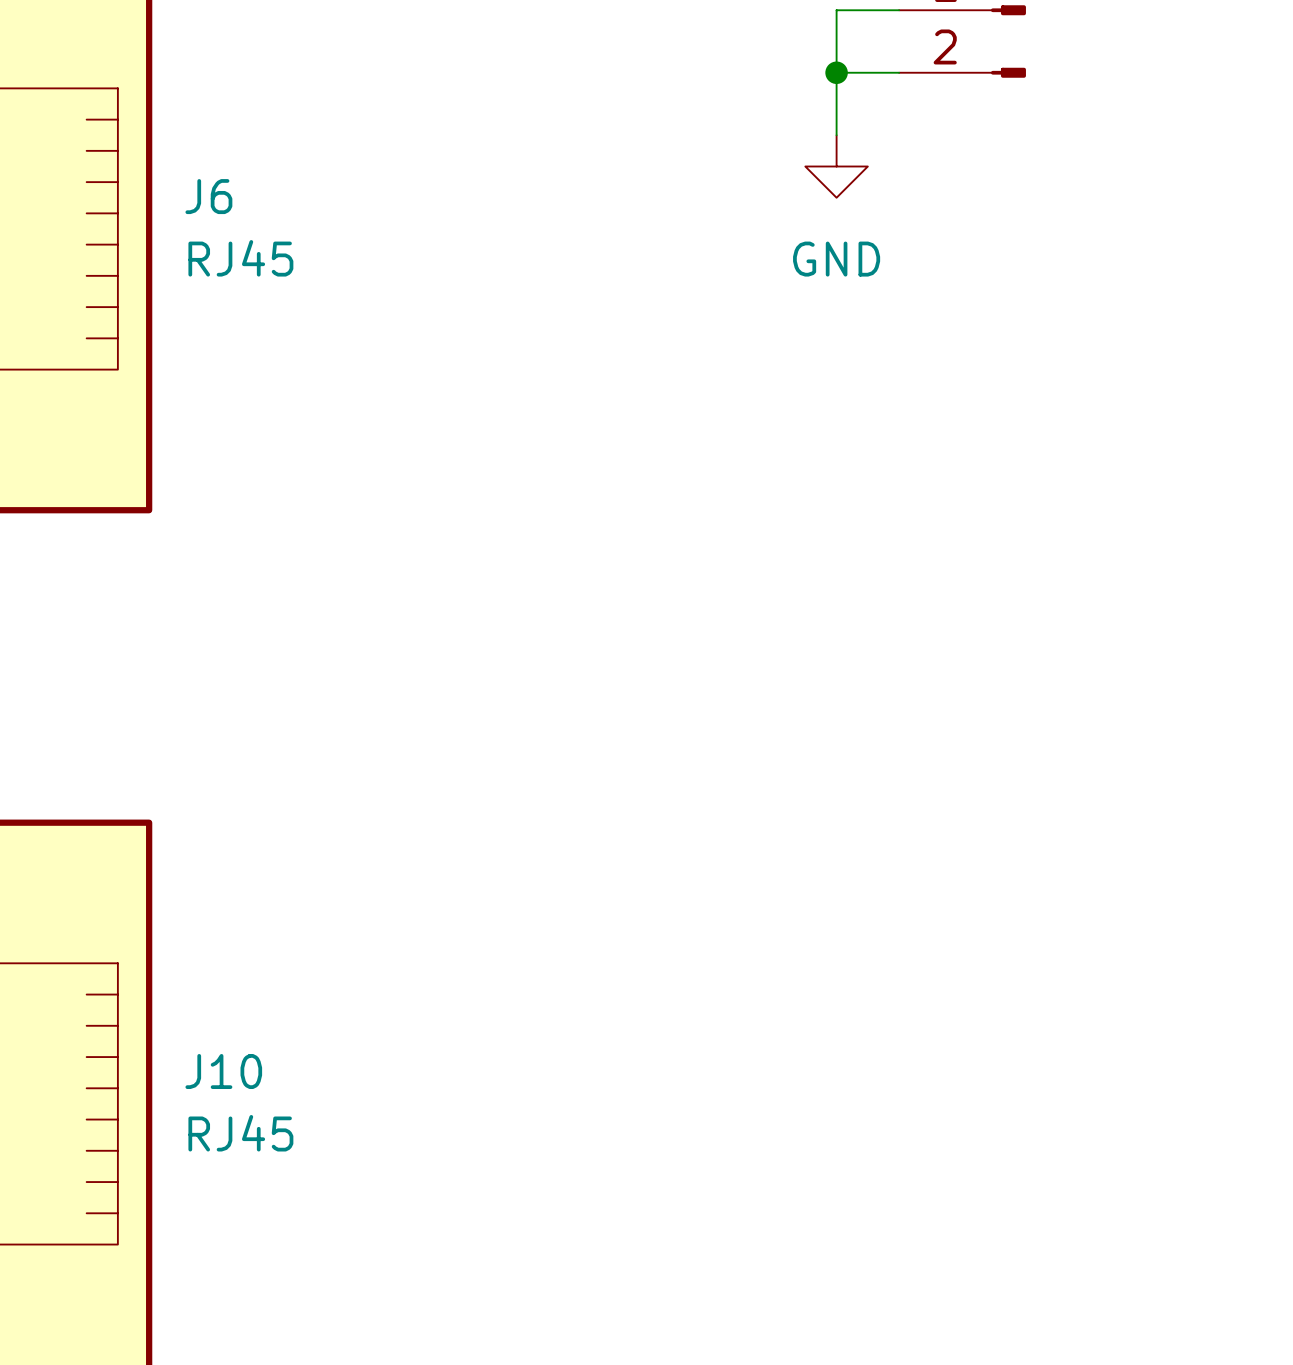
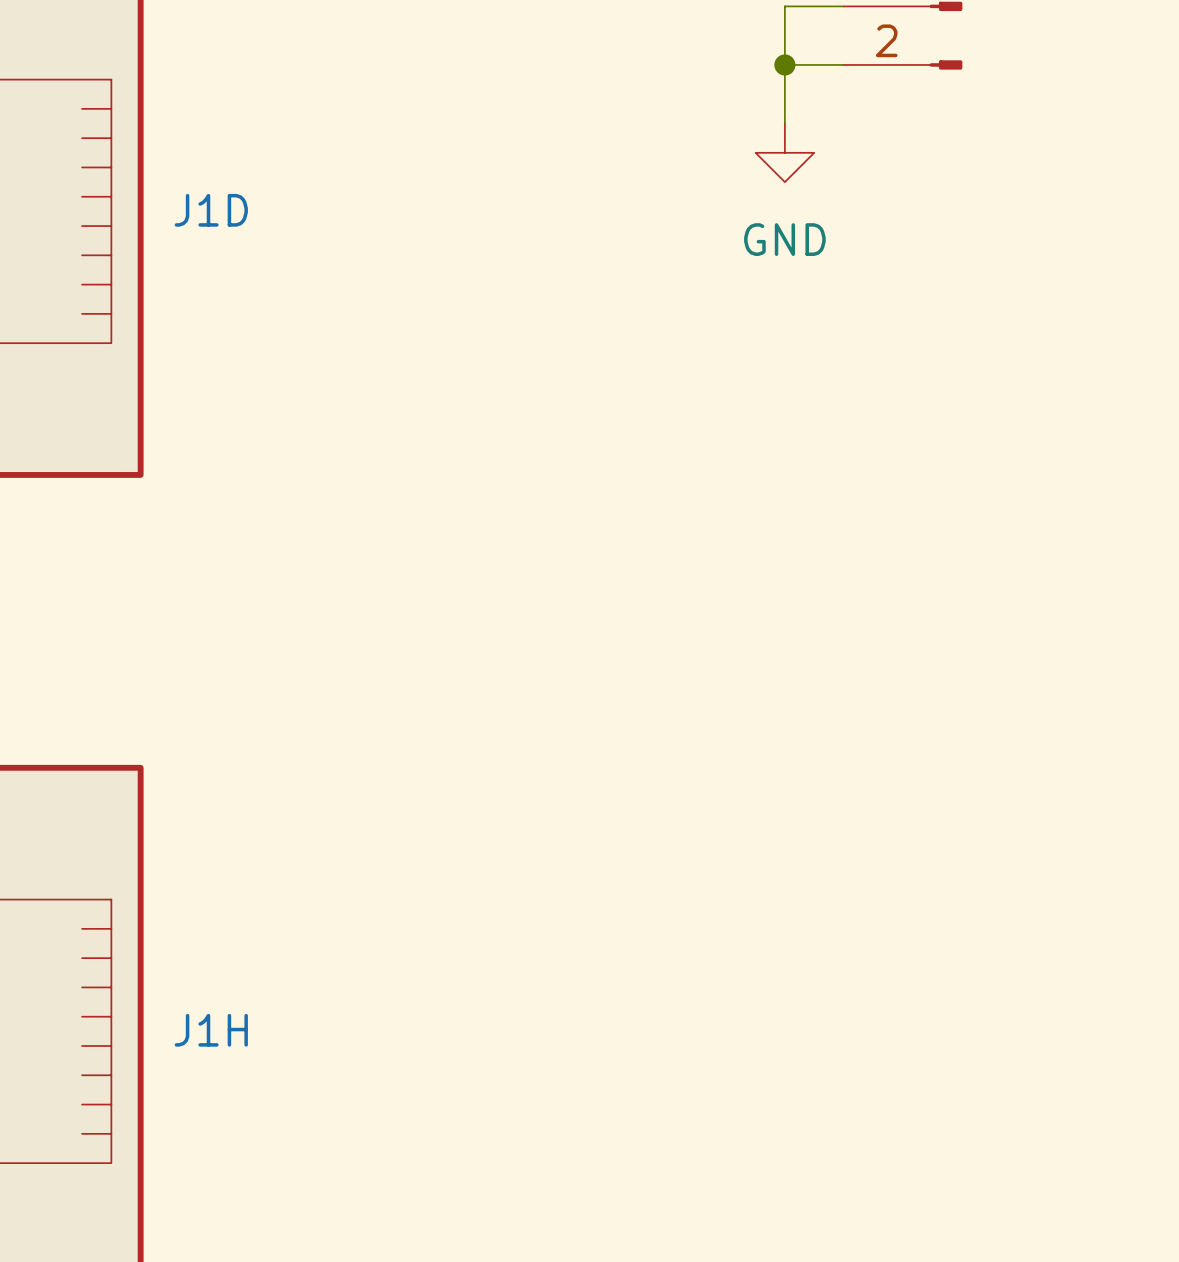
J6 name: J6 (208, 196) -> J1D (211, 210)
J6 value: RJ45 (240, 258) -> none
J10 name: J10 (223, 1071) -> J1H (211, 1030)
J10 value: RJ45 (240, 1133) -> none

